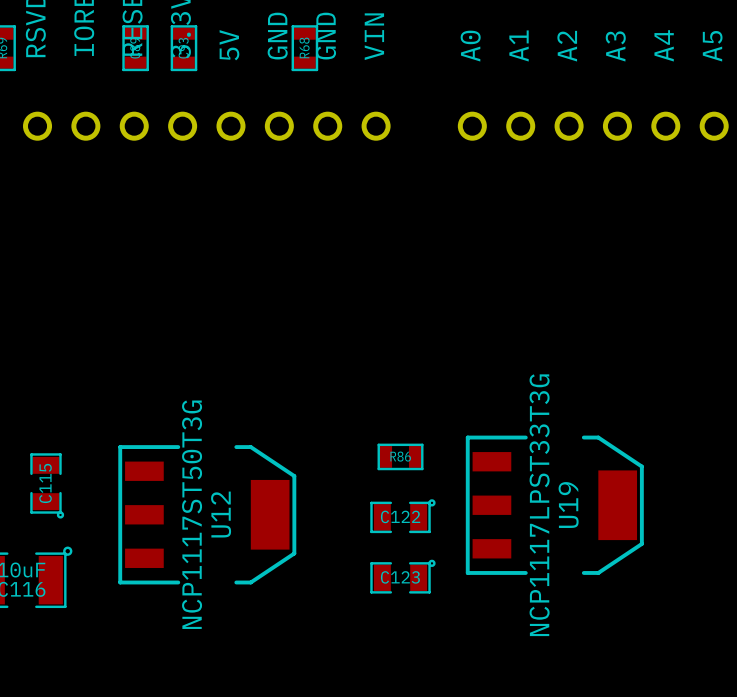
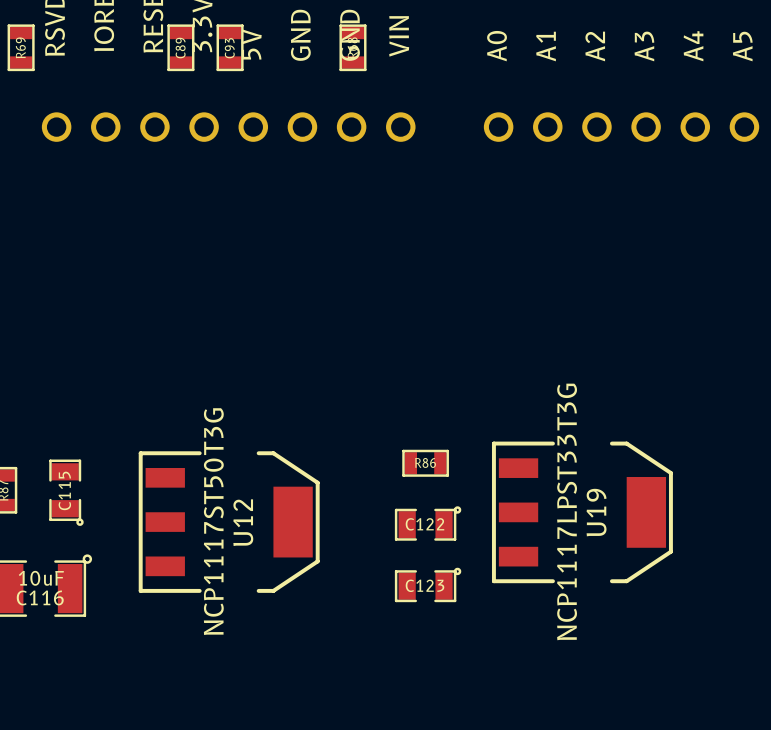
C89 position: (135, 48) -> (180, 47)
C93 position: (183, 48) -> (230, 47)
R68 position: (304, 48) -> (352, 47)

